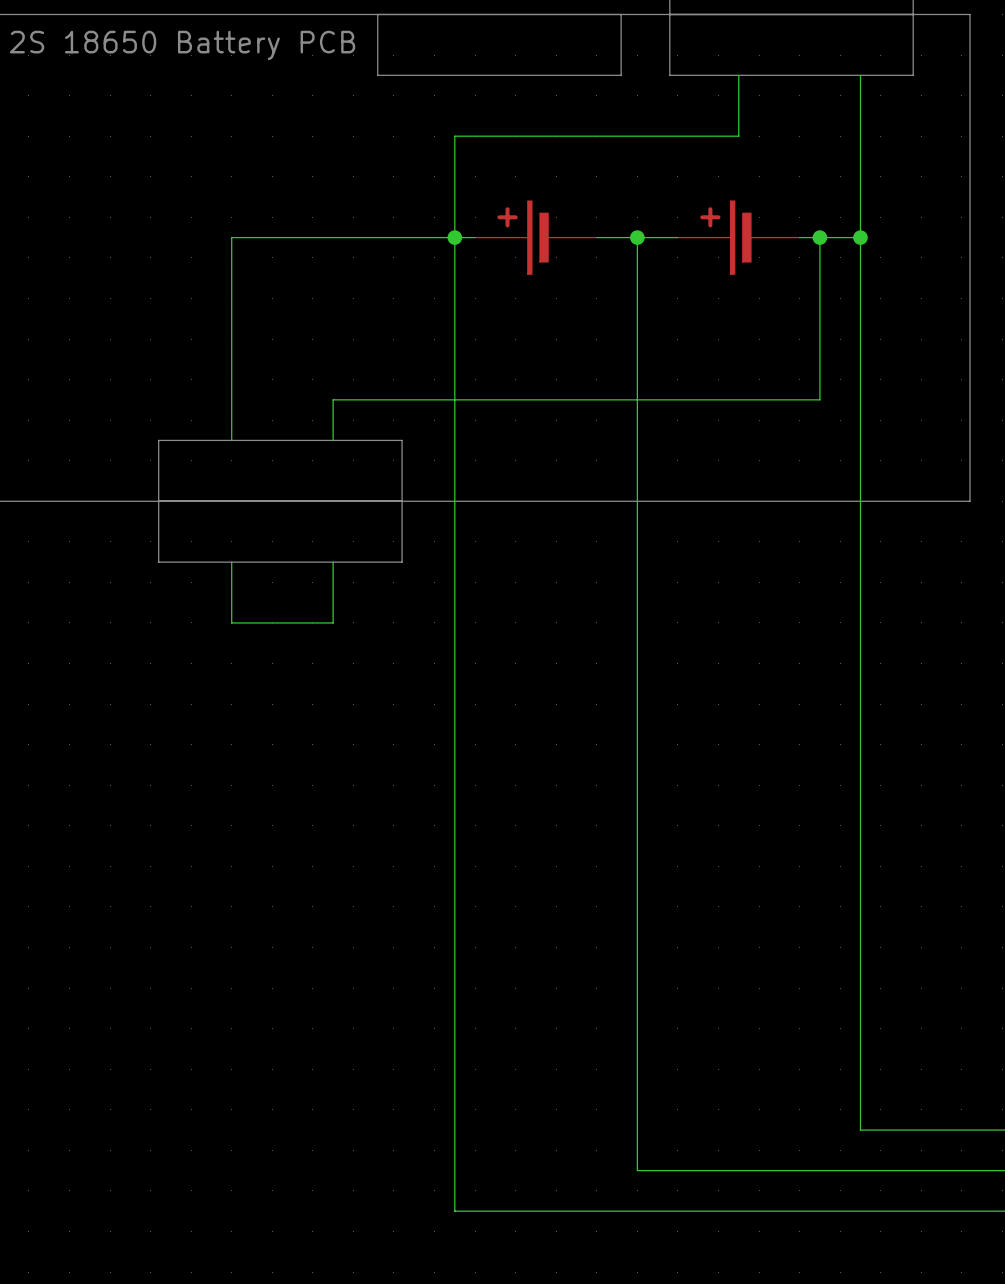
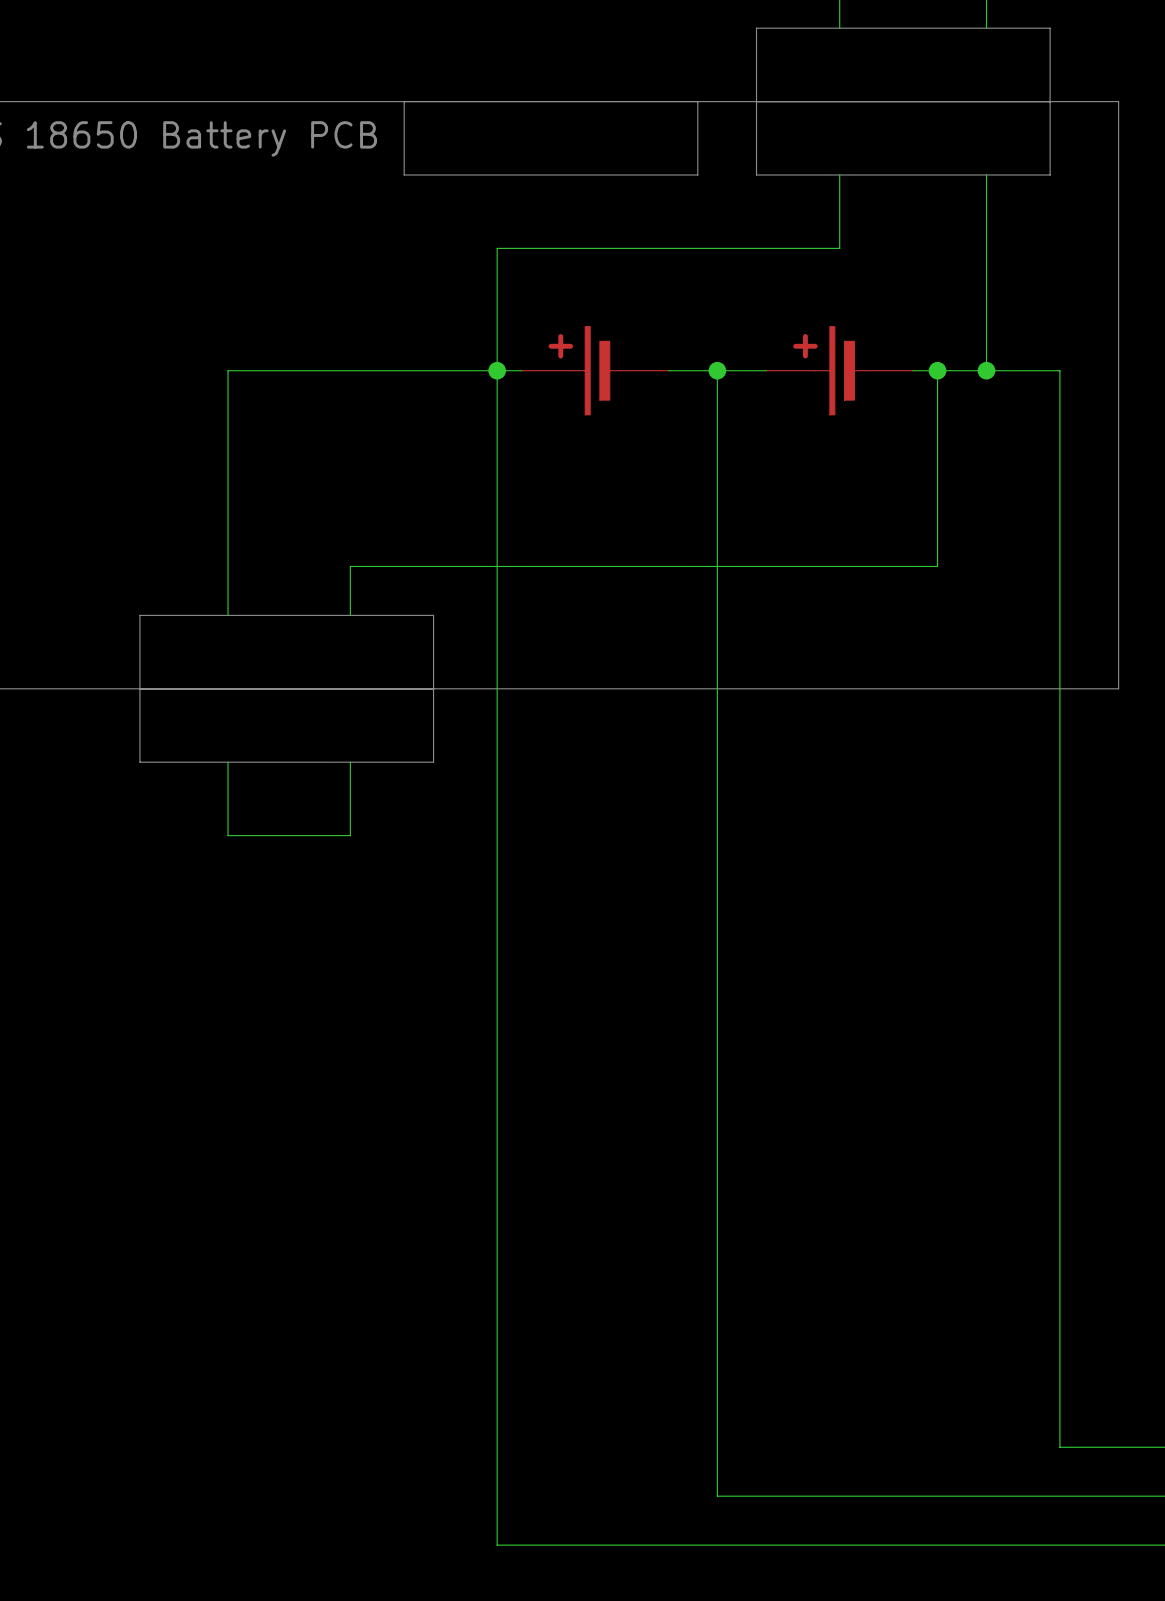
wire: (860, 237) (860, 1130) (921, 1130) -> (986, 370) (1059, 370) (1059, 1447)

